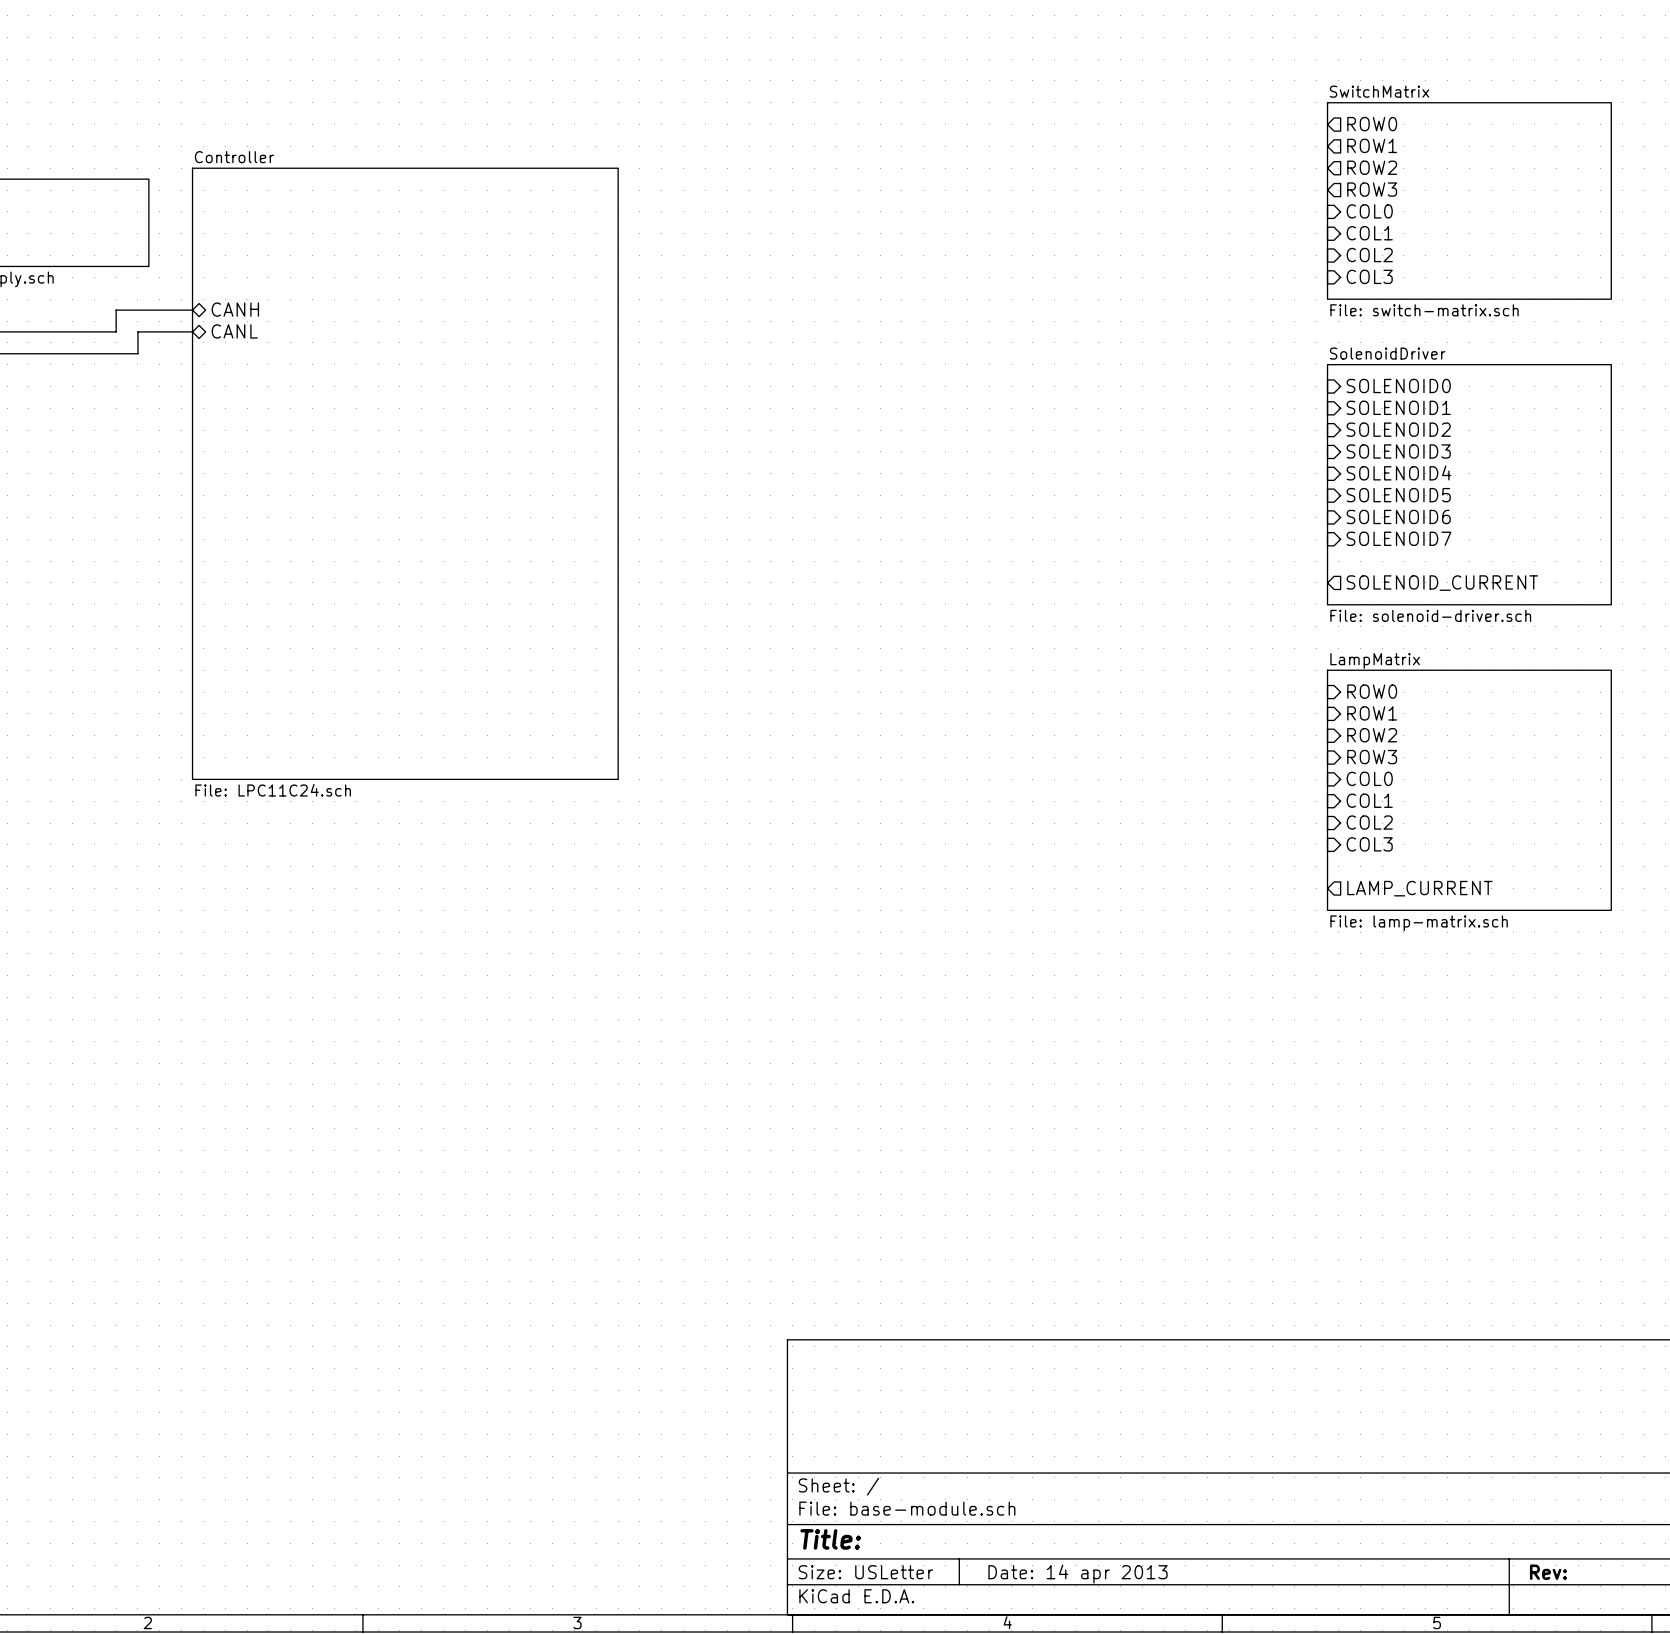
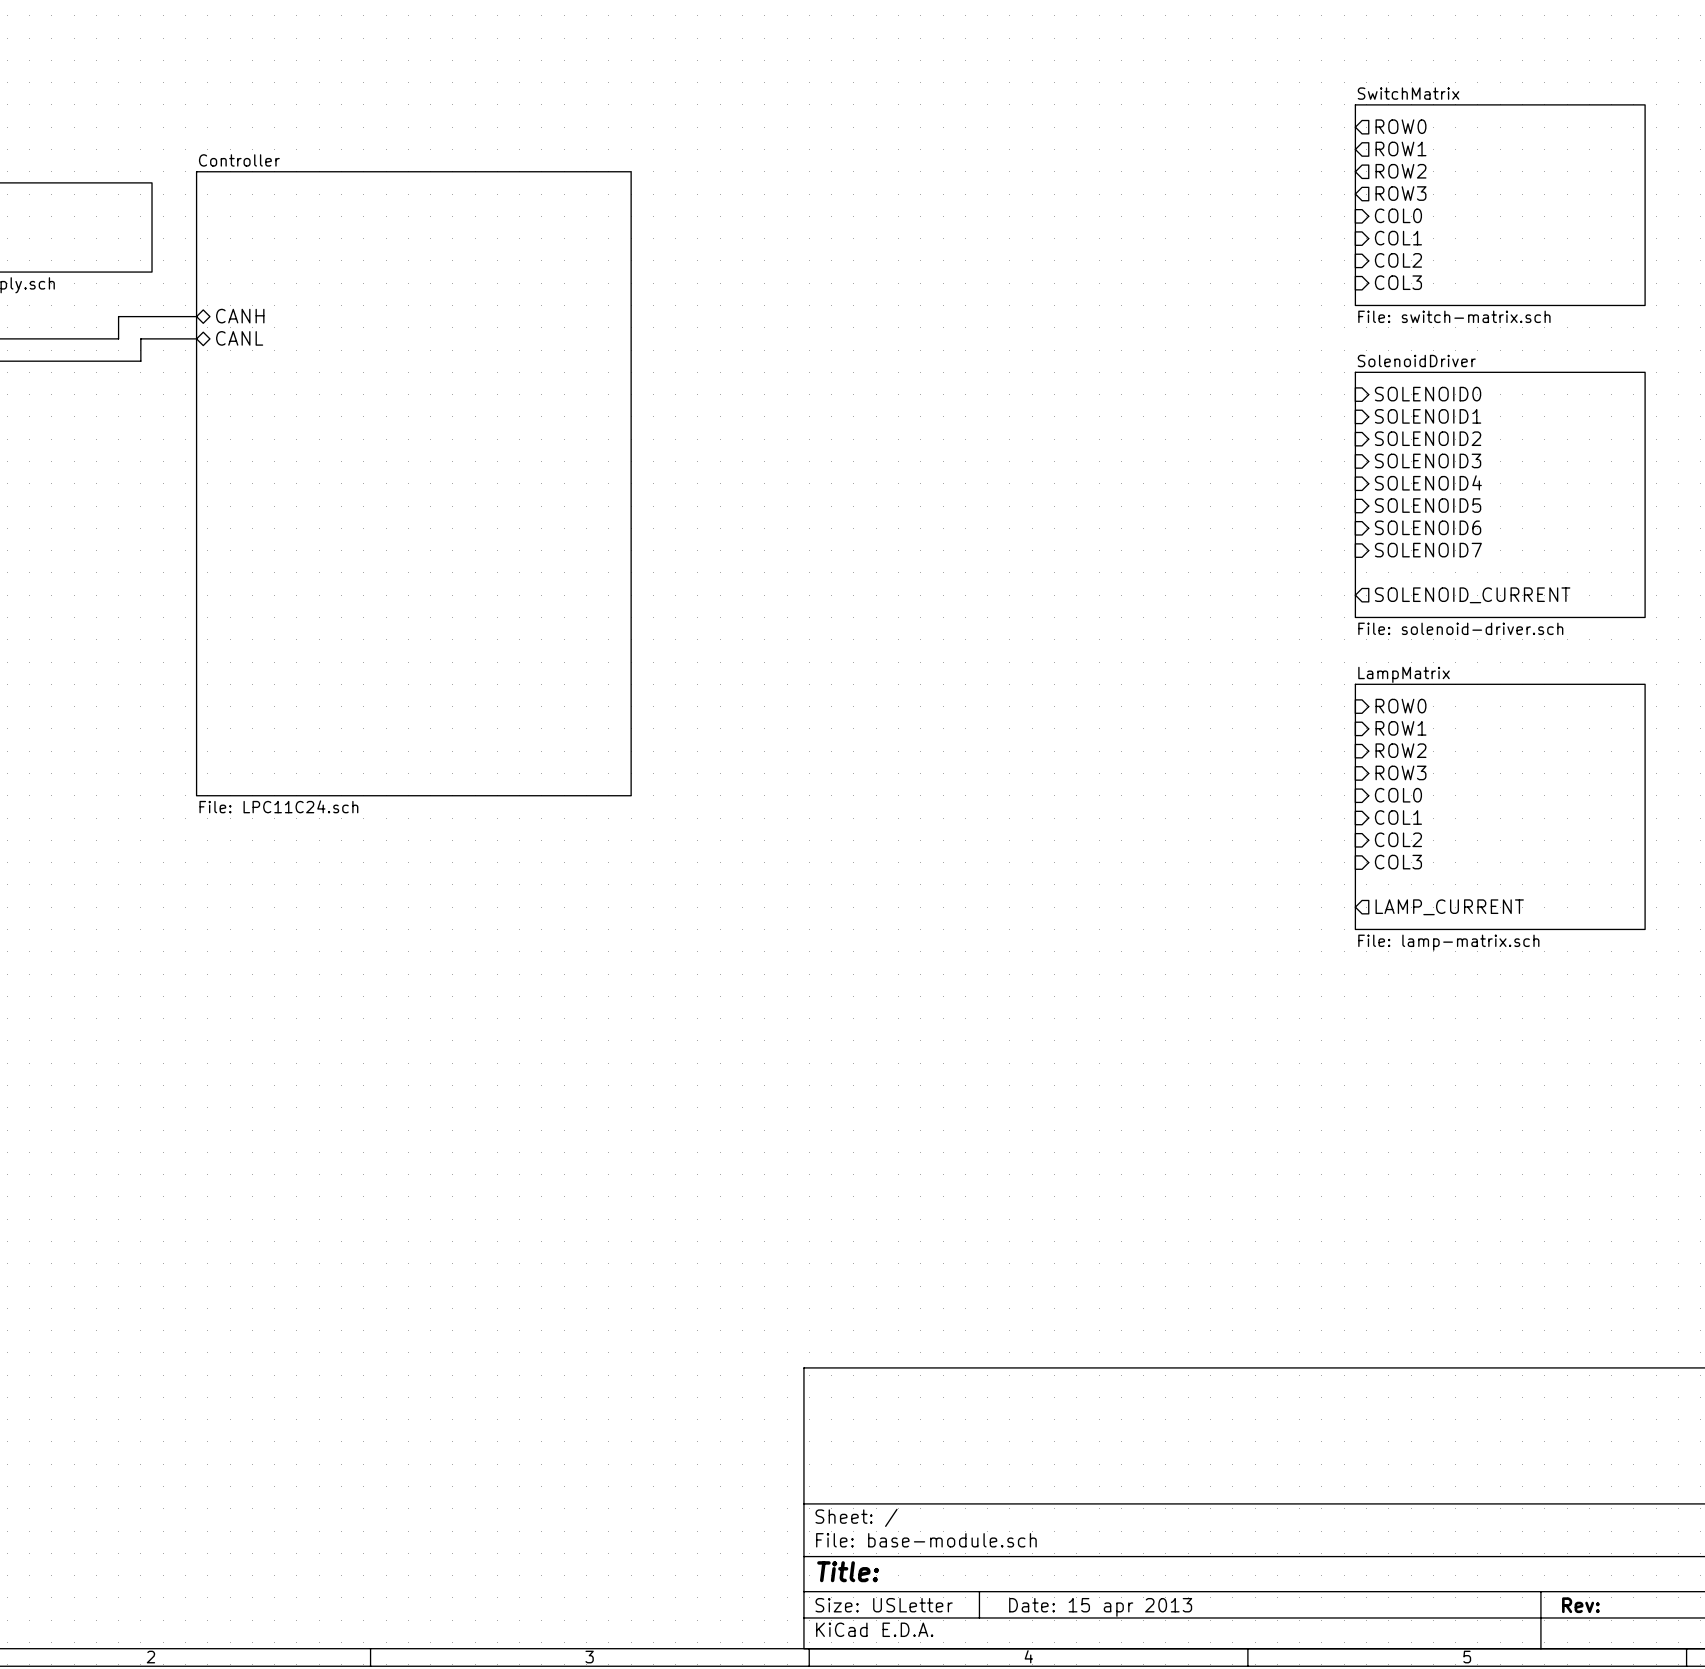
title block: Date: 14 apr 2013 (1078, 1574) -> Date: 15 apr 2013 (1100, 1607)

